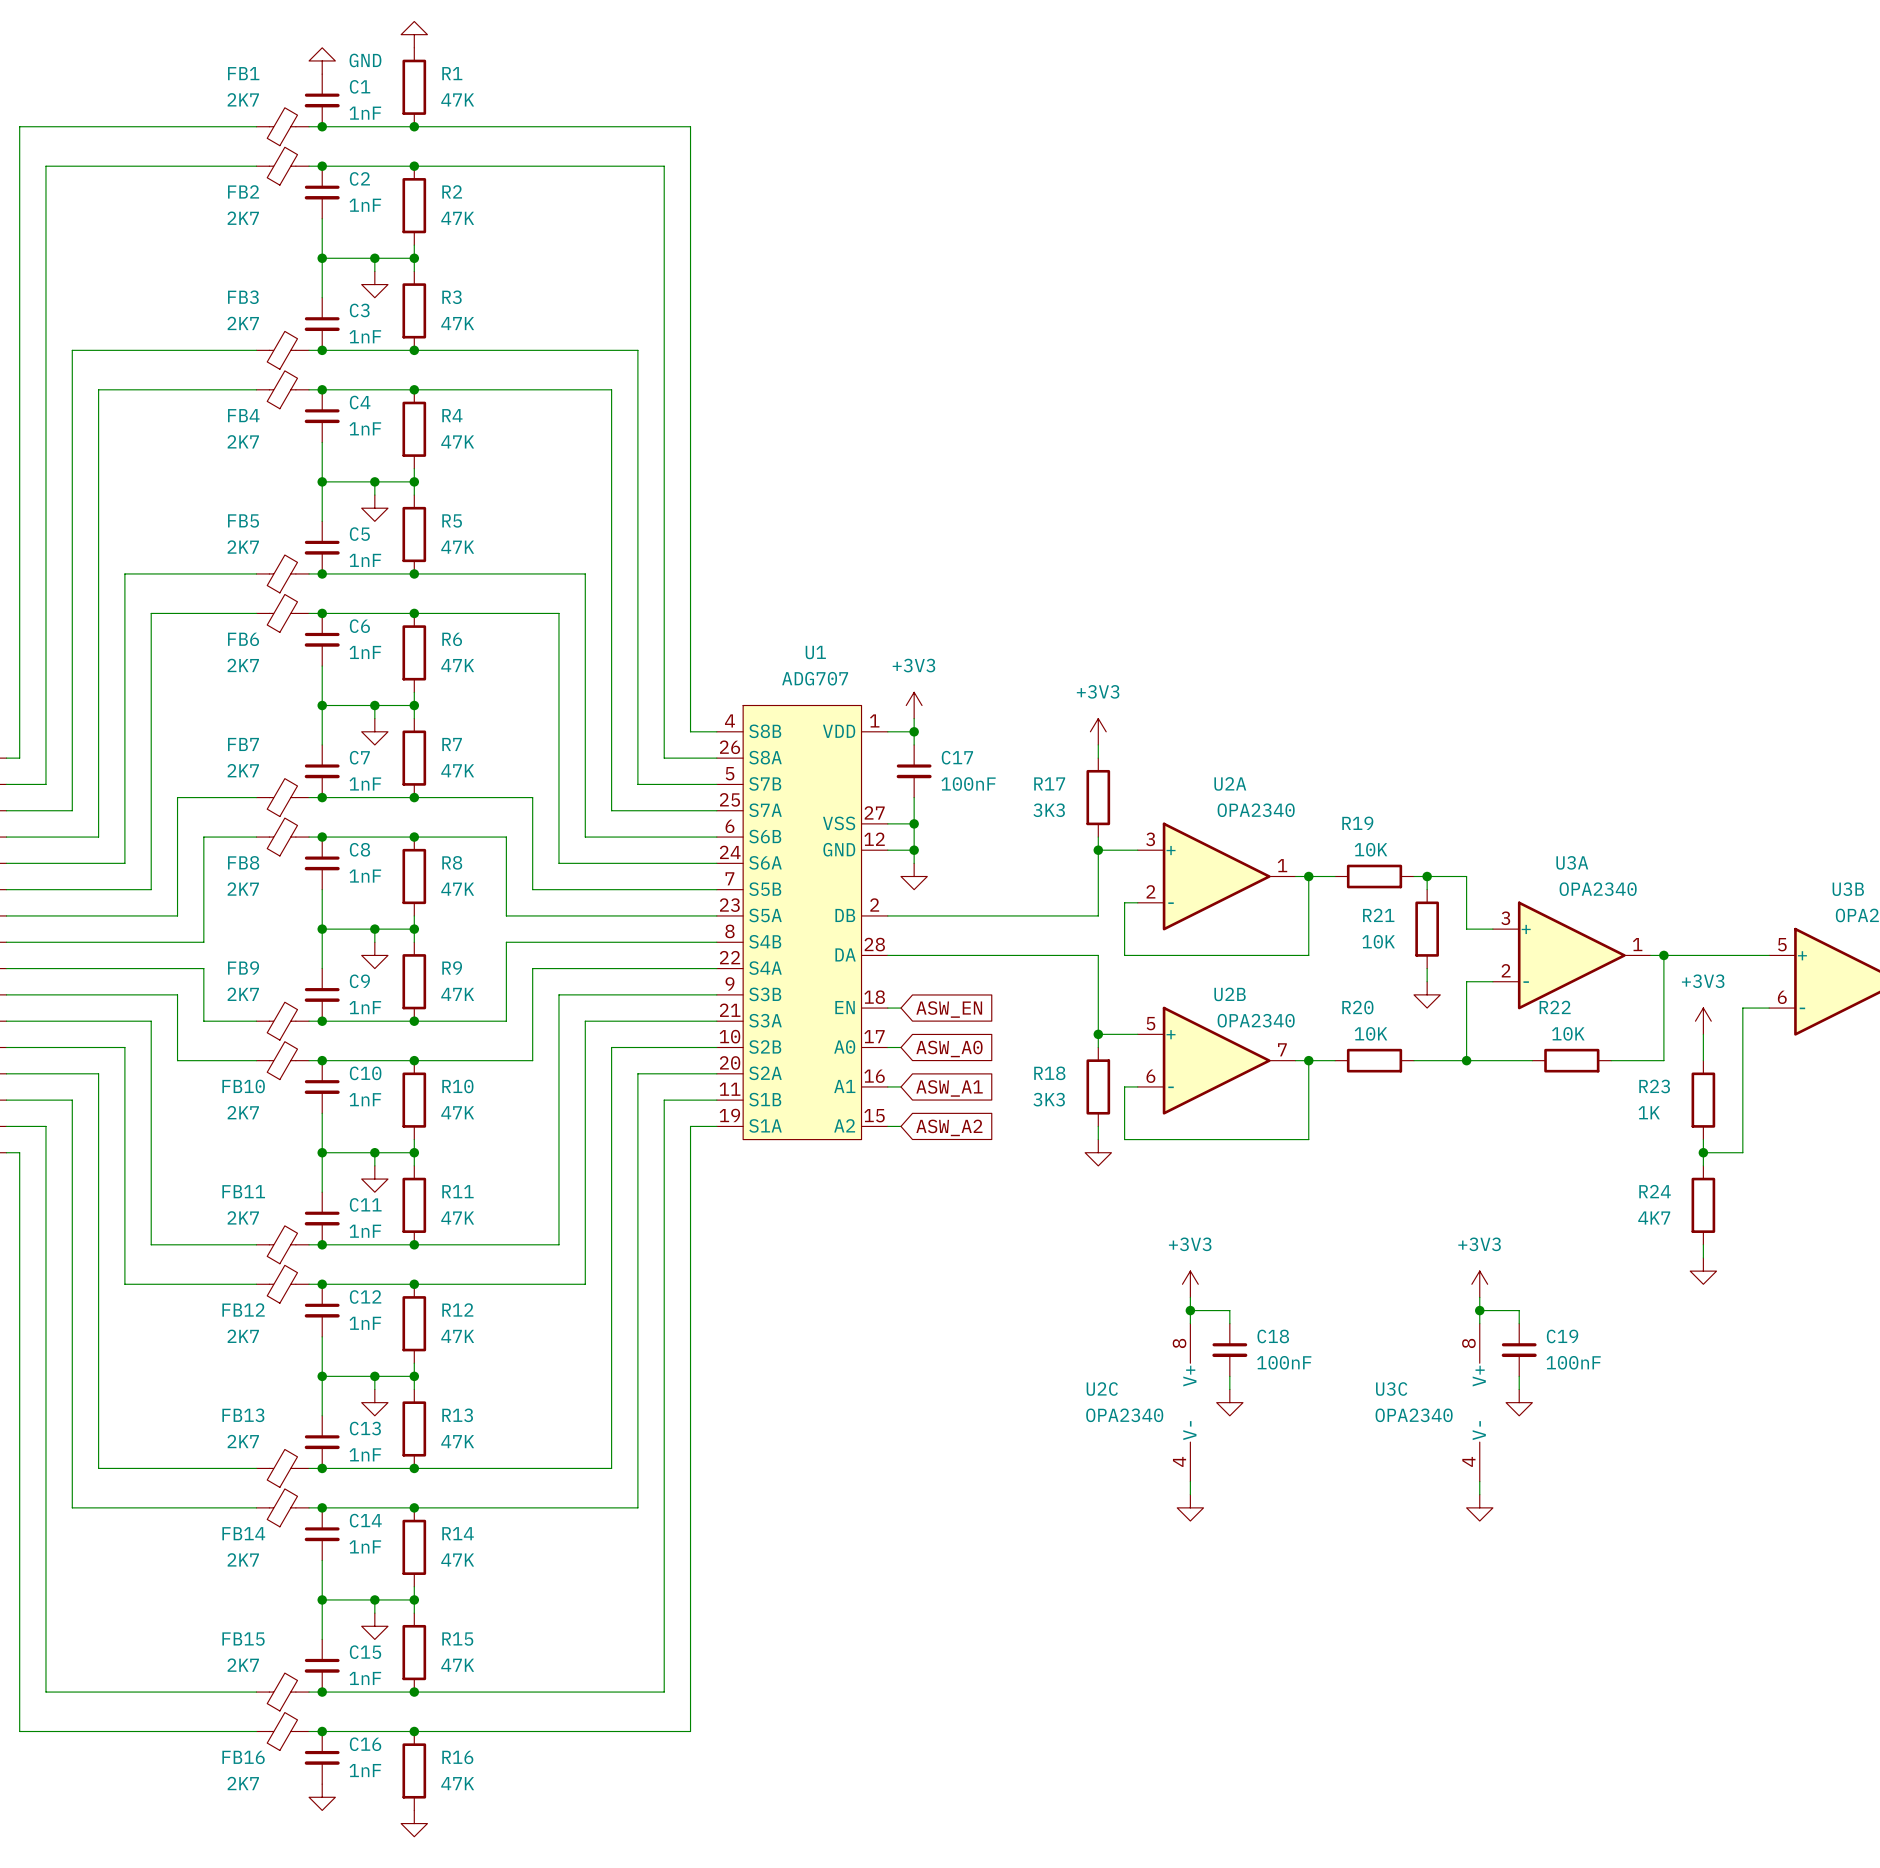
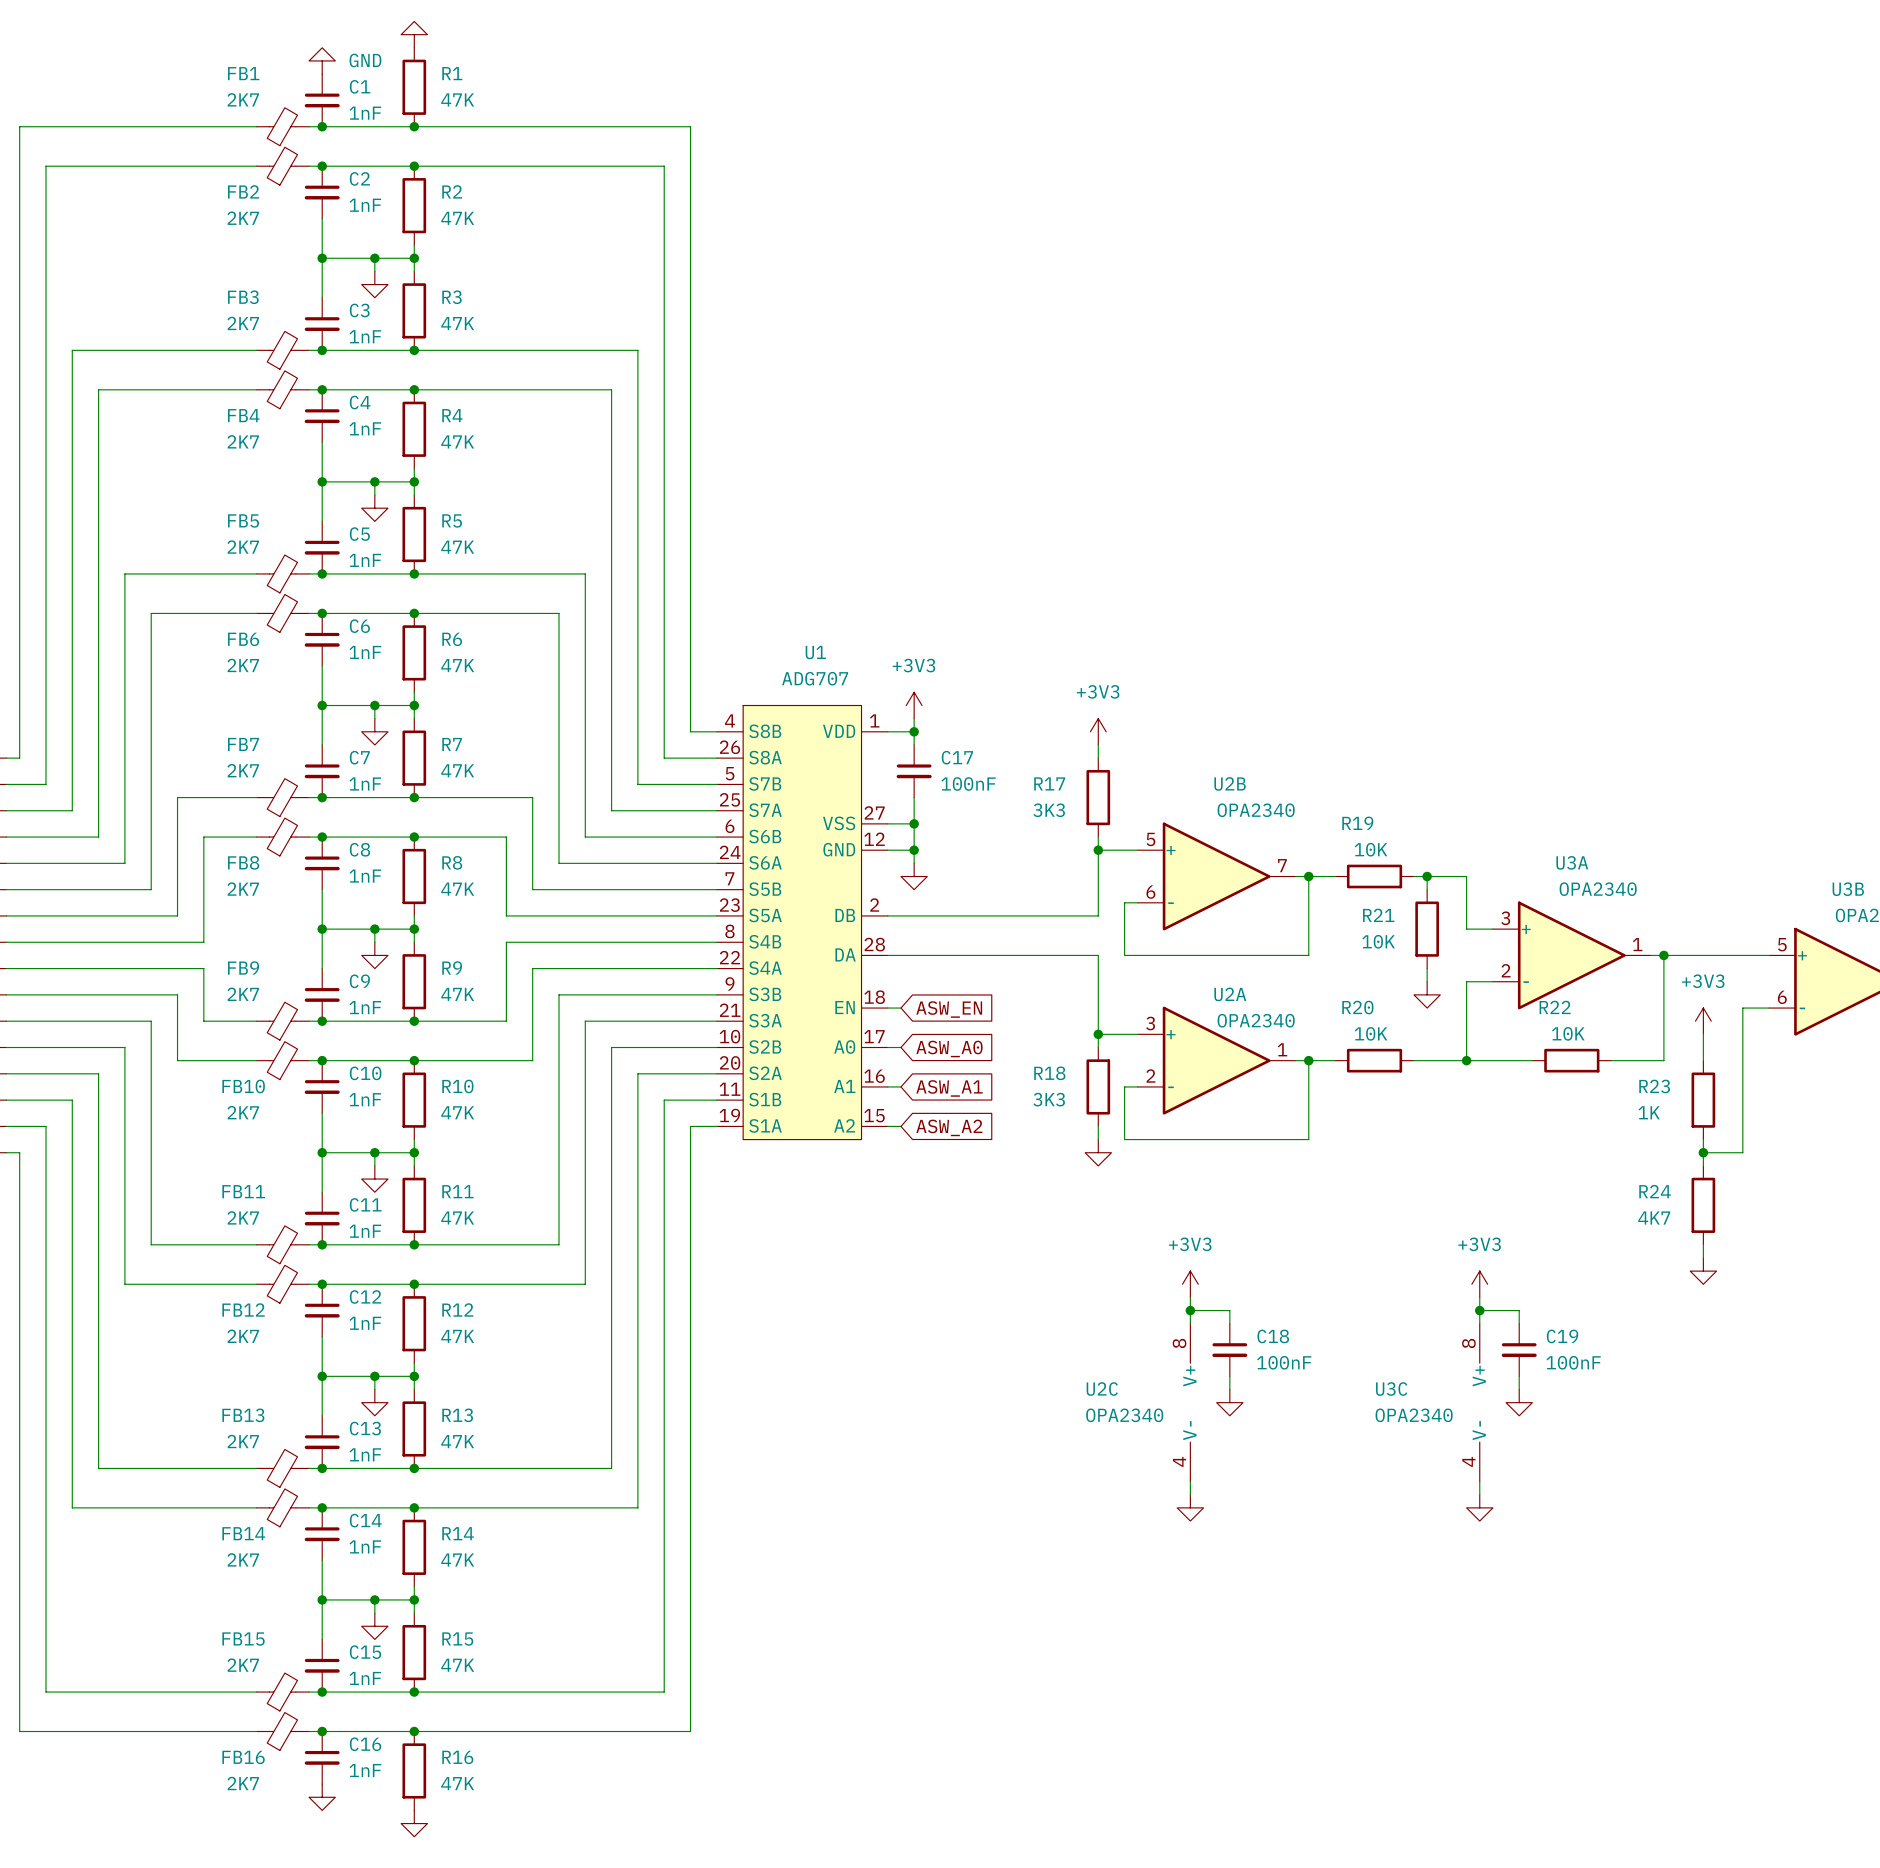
U2A name position: U2A (1230, 783) -> U2A (1230, 994)
U2A position: (1216, 876) -> (1216, 1060)
U2B name position: U2B (1230, 994) -> U2B (1230, 783)
U2B position: (1216, 1060) -> (1216, 876)

